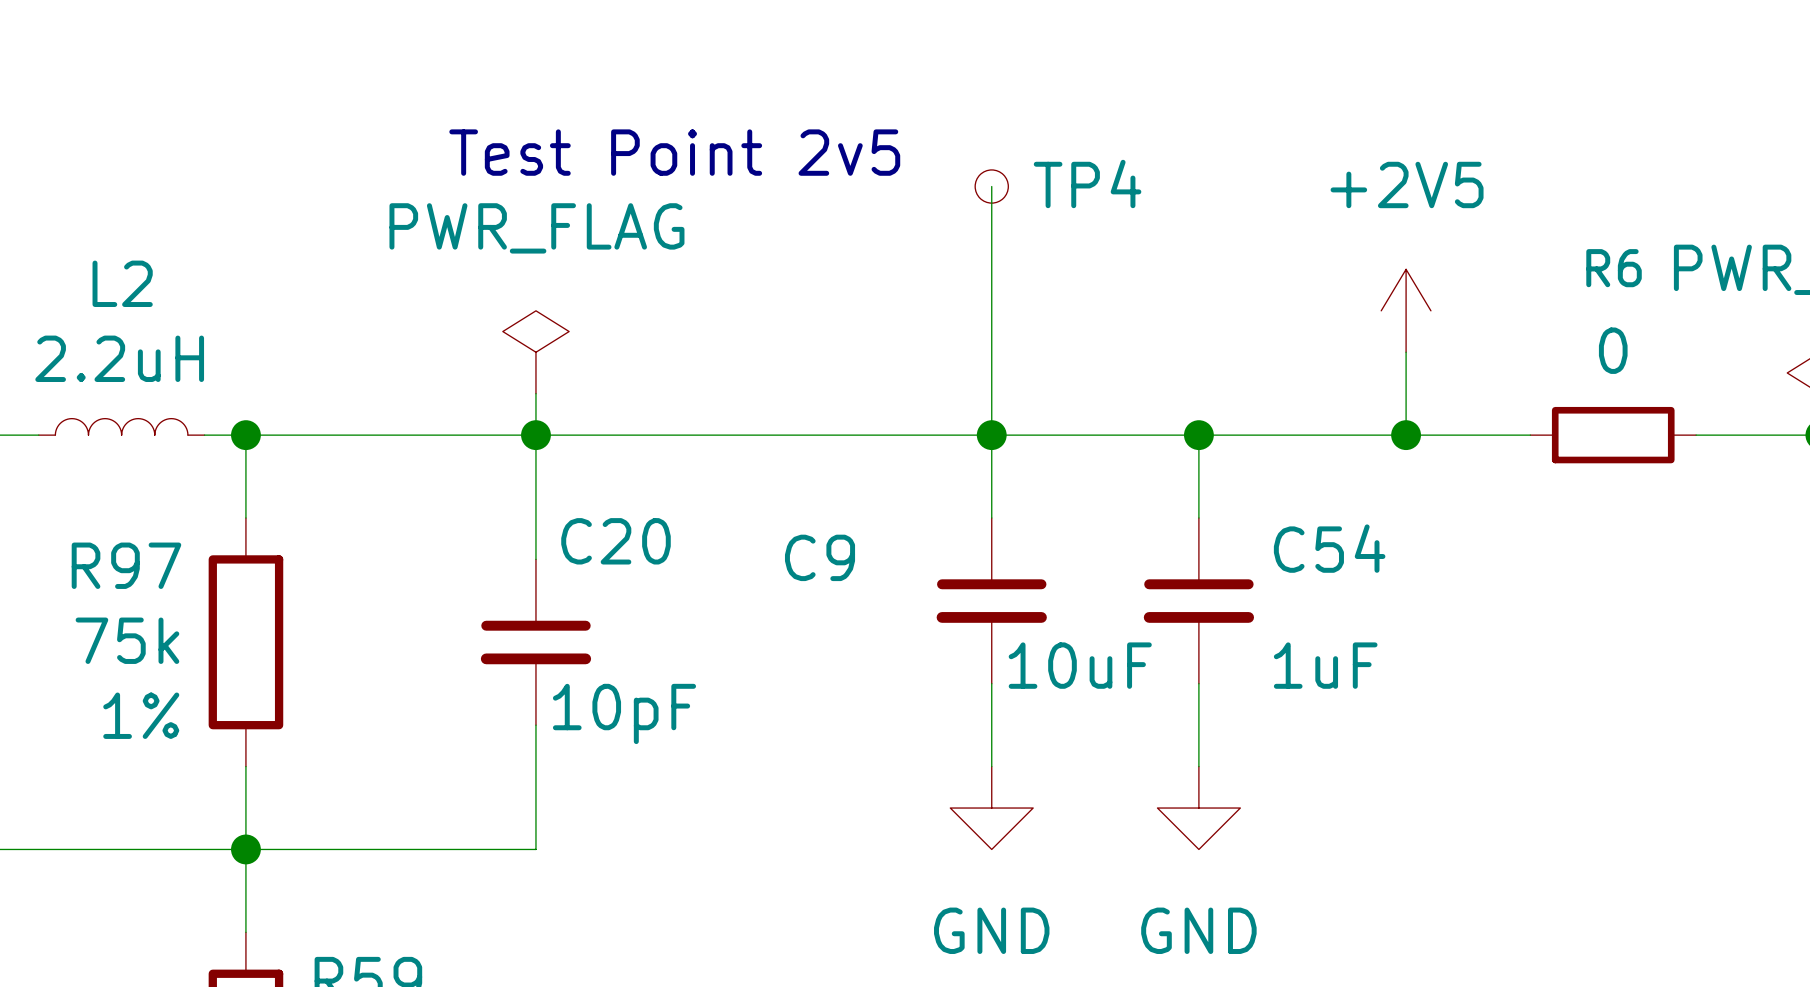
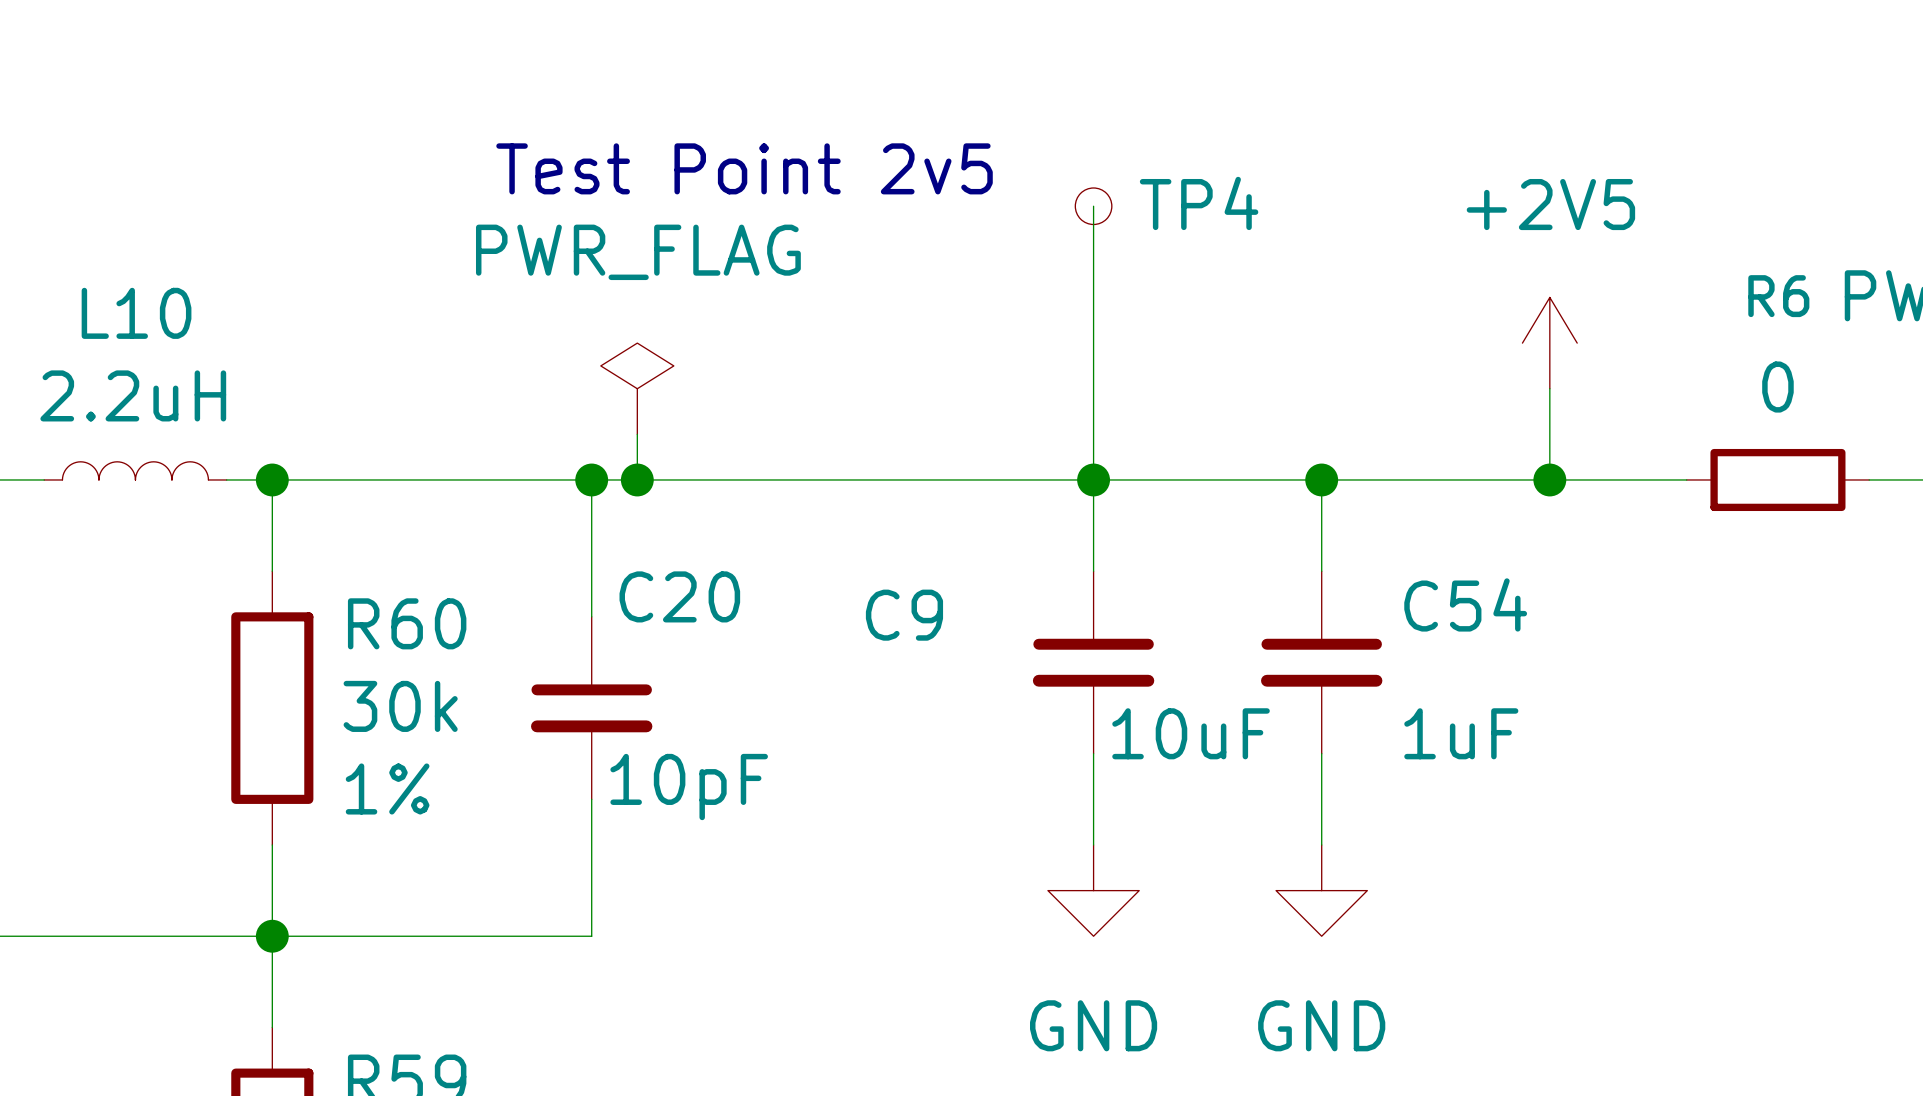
L2 name: L2 (122, 283) -> L10 (136, 313)
power symbol position: PWR_FLAG (535, 352) -> PWR_FLAG (637, 388)
wire: (535, 393) (535, 435) -> (637, 434) (637, 479)
junction: none -> (637, 479)
R97 name: R97 (126, 565) -> R60 (407, 623)
R97 value: 75k (127, 640) -> 30k (400, 706)
R97 text position: 1% (141, 715) -> 1% (387, 788)

